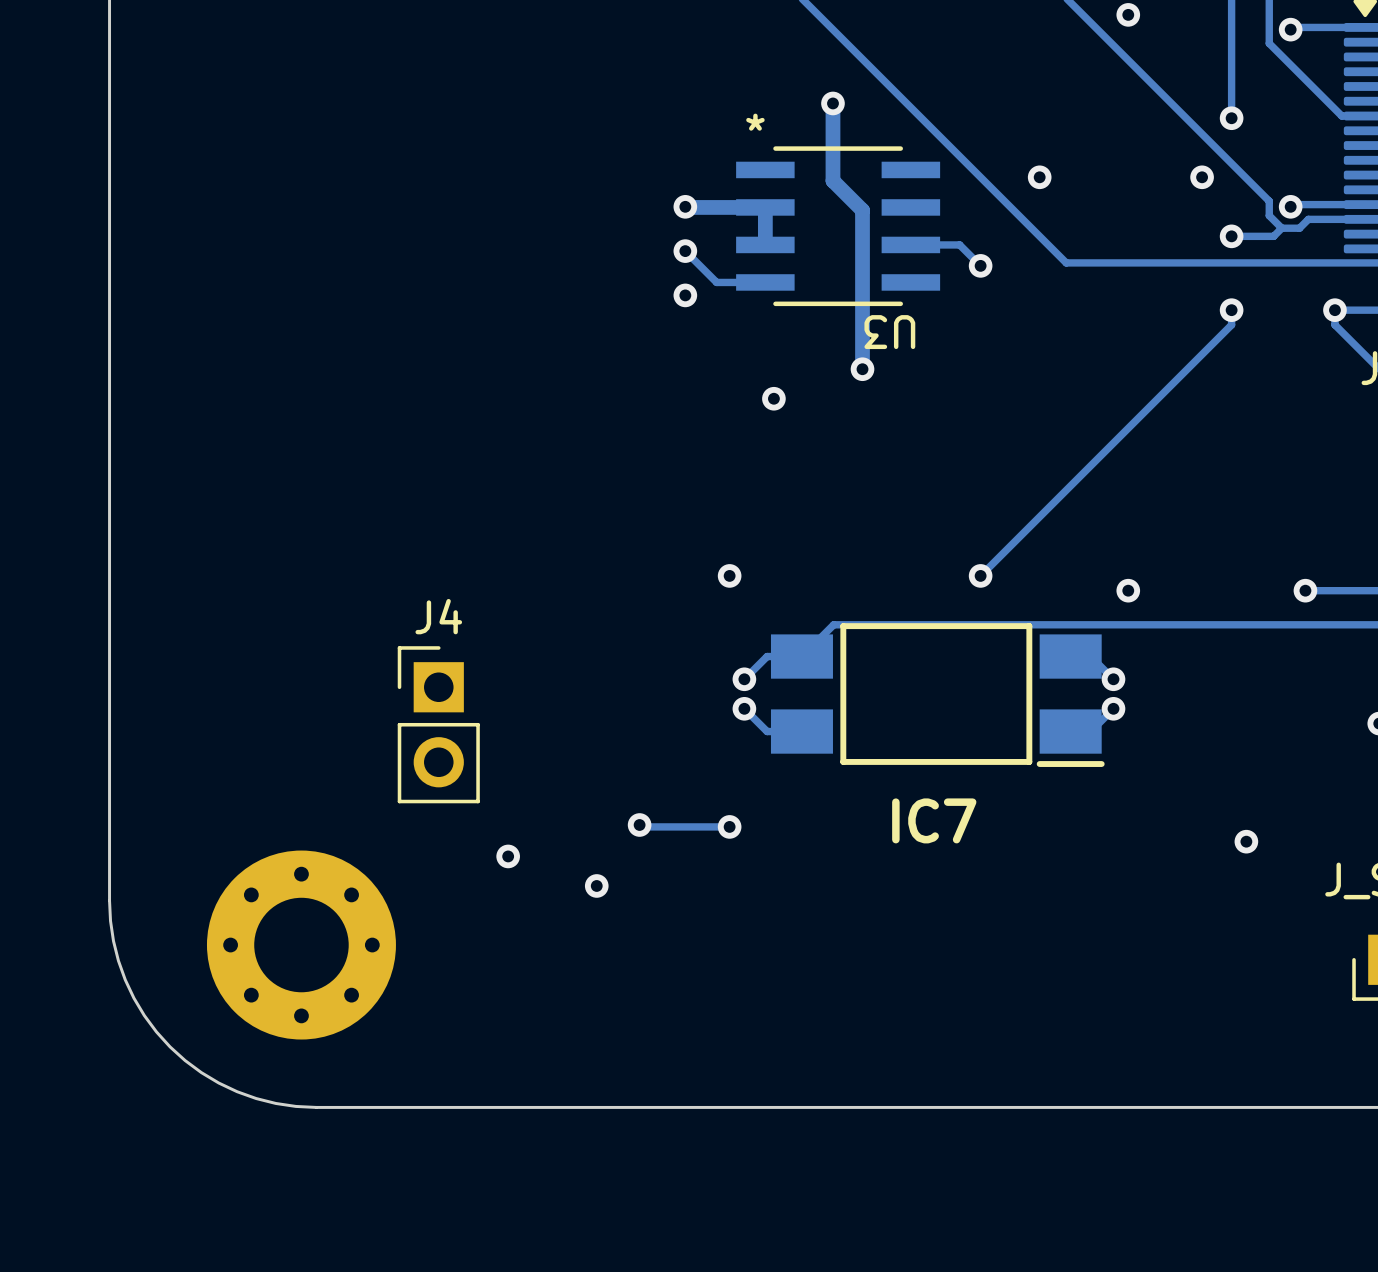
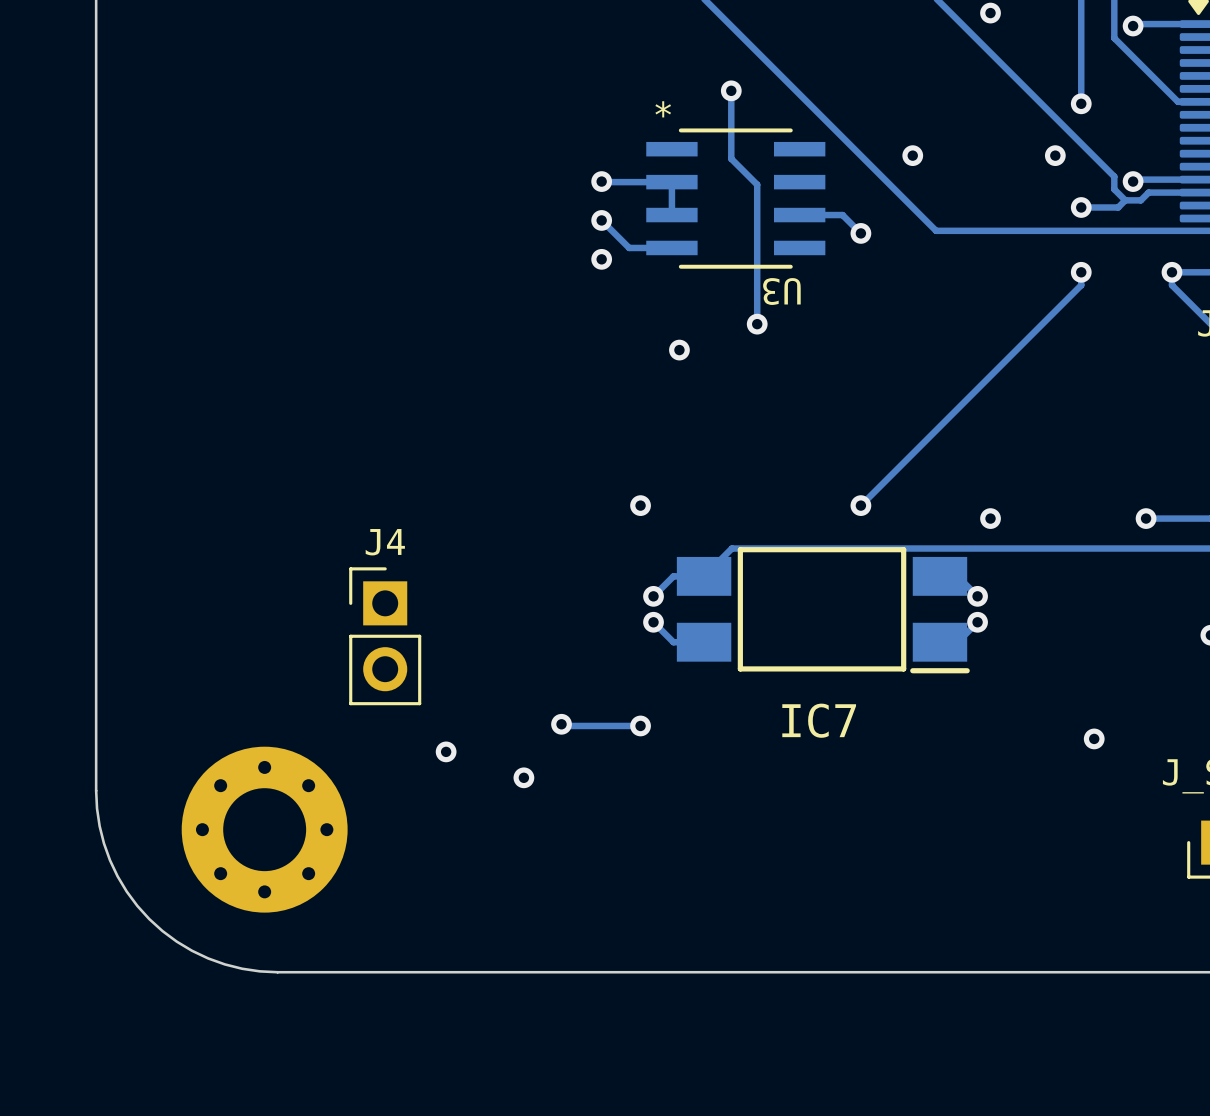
track width: thick (832, 103) (832, 180) (862, 210) (862, 369) -> thin (731, 90) (731, 158) (757, 184) (757, 324)
track width: thick (685, 206) (765, 207) (765, 244) -> thin (601, 181) (671, 182) (671, 215)

